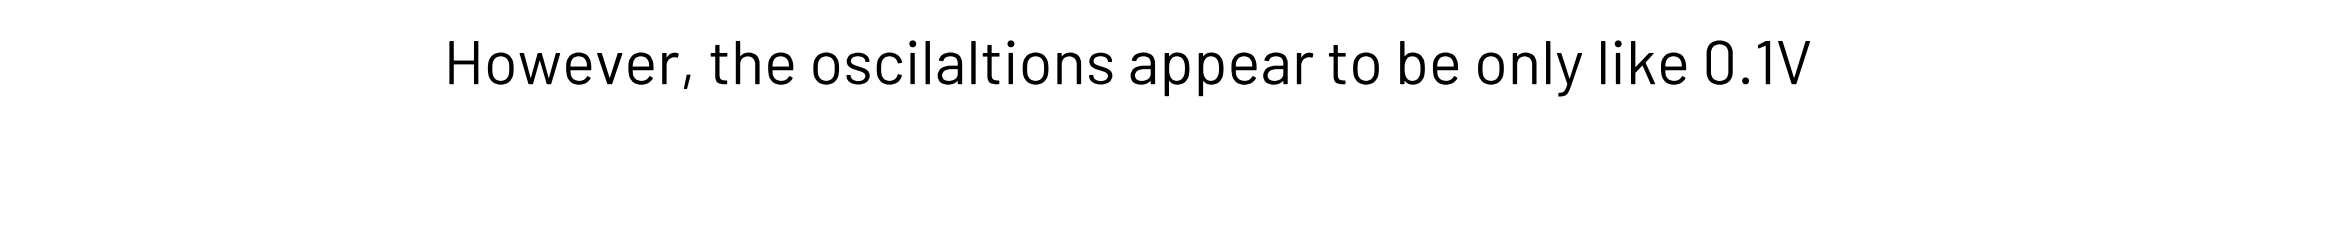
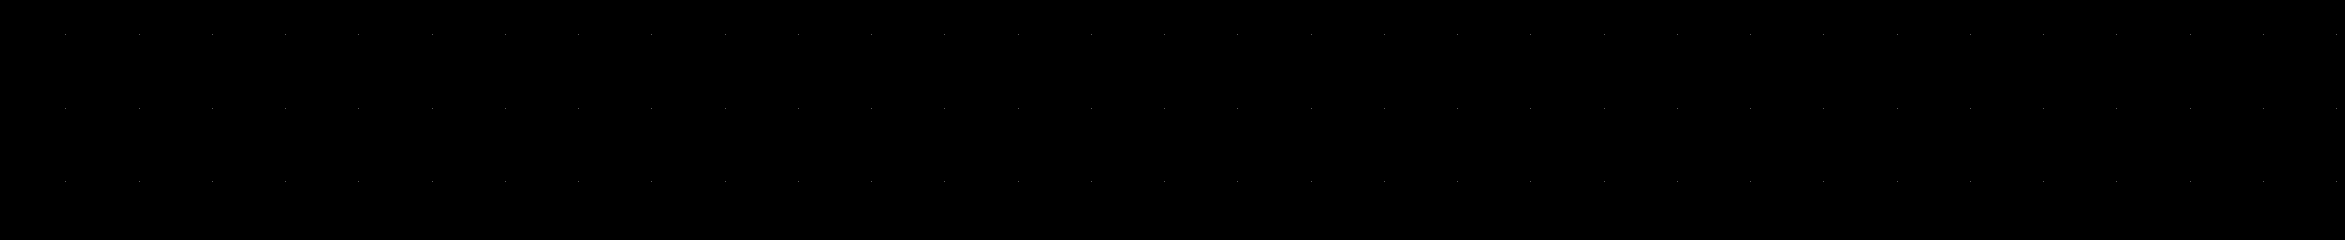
text: However, the oscilaltions appear to be only like 0.1V (1129, 68) -> none

